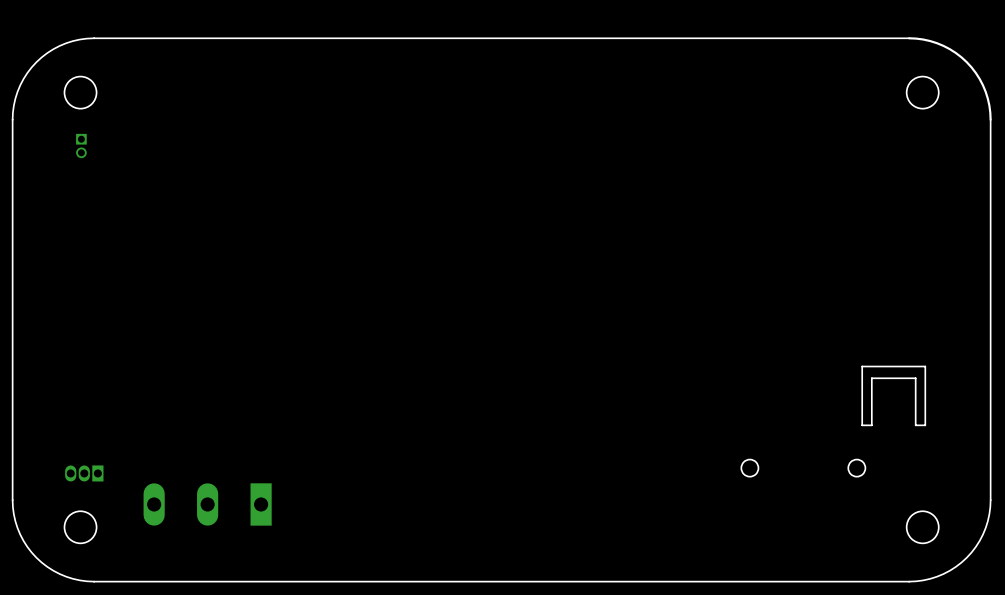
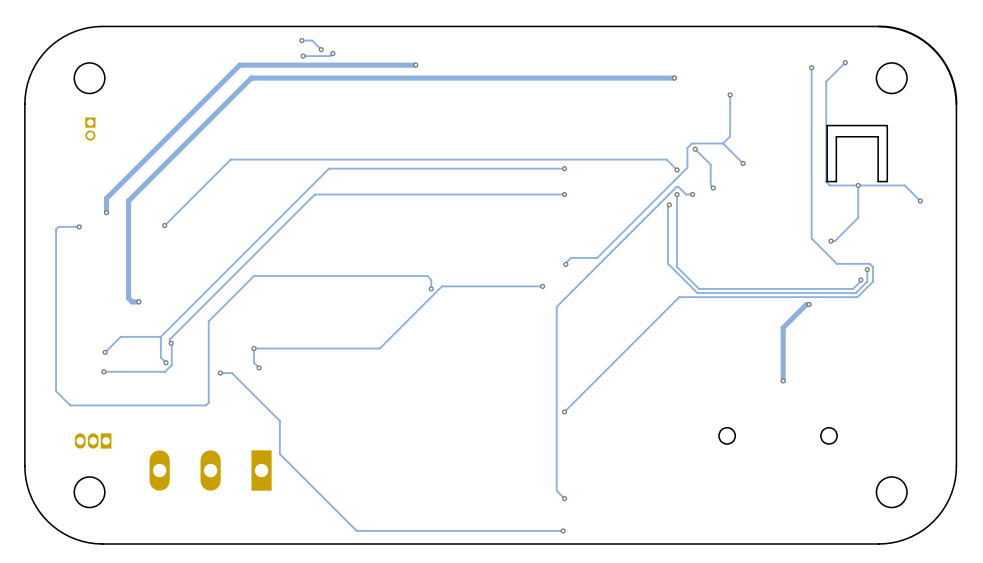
track: none -> (301, 40) (312, 40) (321, 49)
via: none -> (301, 40)
via: none -> (321, 49)
track: none -> (332, 53) (330, 56) (303, 56)
via: none -> (332, 53)
via: none -> (303, 56)
track: none -> (845, 62) (826, 81) (826, 181) (829, 185) (904, 185) (920, 201)
via: none -> (845, 62)
track: none -> (415, 65) (239, 65) (106, 198) (106, 212)
via: none -> (415, 65)
track: none -> (811, 67) (811, 238) (836, 263) (869, 263) (873, 267) (873, 281) (857, 297) (679, 297) (564, 411)
via: none -> (811, 67)
track: none -> (674, 78) (251, 78) (128, 201) (128, 298) (132, 301) (138, 301)
via: none -> (674, 78)
track: none -> (730, 94) (730, 136) (723, 143)
via: none -> (730, 94)
track: none -> (723, 143) (743, 163)
track: none -> (723, 143) (691, 143) (687, 147) (687, 167) (597, 257) (570, 257) (565, 264)
track: none -> (695, 149) (710, 164) (710, 185) (713, 188)
via: none -> (695, 149)
via: none -> (743, 163)
track: none -> (564, 168) (329, 168) (160, 336)
via: none -> (564, 168)
track: none -> (677, 169) (666, 159) (230, 159) (164, 225)
via: none -> (677, 169)
track: none -> (858, 185) (858, 217) (834, 241) (831, 241)
via: none -> (858, 185)
via: none -> (713, 188)
track: none -> (564, 194) (314, 194) (169, 339) (171, 343) (171, 365) (165, 371) (103, 371)
via: none -> (564, 194)
track: none -> (677, 194) (677, 266) (699, 288) (853, 288) (862, 279)
via: none -> (677, 194)
track: none -> (692, 194) (686, 194) (676, 186) (556, 306) (556, 490) (565, 497)
via: none -> (692, 194)
via: none -> (920, 201)
track: none -> (669, 204) (668, 263) (697, 293) (855, 293) (867, 281) (867, 269)
via: none -> (669, 204)
via: none -> (106, 212)
via: none -> (164, 225)
track: none -> (79, 226) (58, 226) (56, 229) (56, 391) (70, 405) (206, 405) (208, 402) (208, 321) (254, 276) (427, 276) (431, 279) (431, 288)
via: none -> (79, 226)
via: none -> (831, 241)
via: none -> (565, 264)
via: none -> (867, 269)
via: none -> (860, 279)
track: none -> (542, 286) (441, 286) (379, 348) (254, 348) (254, 362) (259, 367)
via: none -> (542, 286)
via: none -> (431, 288)
via: none -> (138, 301)
track: none -> (809, 304) (806, 304) (783, 327) (783, 380)
via: none -> (809, 304)
track: none -> (160, 336) (120, 336) (105, 352)
track: none -> (160, 336) (160, 357) (166, 362)
board edge: (925, 366) (925, 425) (915, 425) (915, 378) (871, 378) (871, 425) (862, 425) (862, 366) (925, 366) -> (887, 125) (887, 181) (878, 181) (878, 136) (836, 136) (836, 181) (827, 181) (827, 125) (887, 125)
via: none -> (171, 343)
via: none -> (254, 348)
via: none -> (105, 352)
via: none -> (166, 362)
via: none -> (259, 367)
via: none -> (103, 371)
track: none -> (220, 373) (232, 373) (279, 420) (279, 454) (356, 530) (563, 530)
via: none -> (220, 373)
via: none -> (783, 380)
via: none -> (564, 411)
via: none -> (564, 498)
via: none -> (563, 530)

